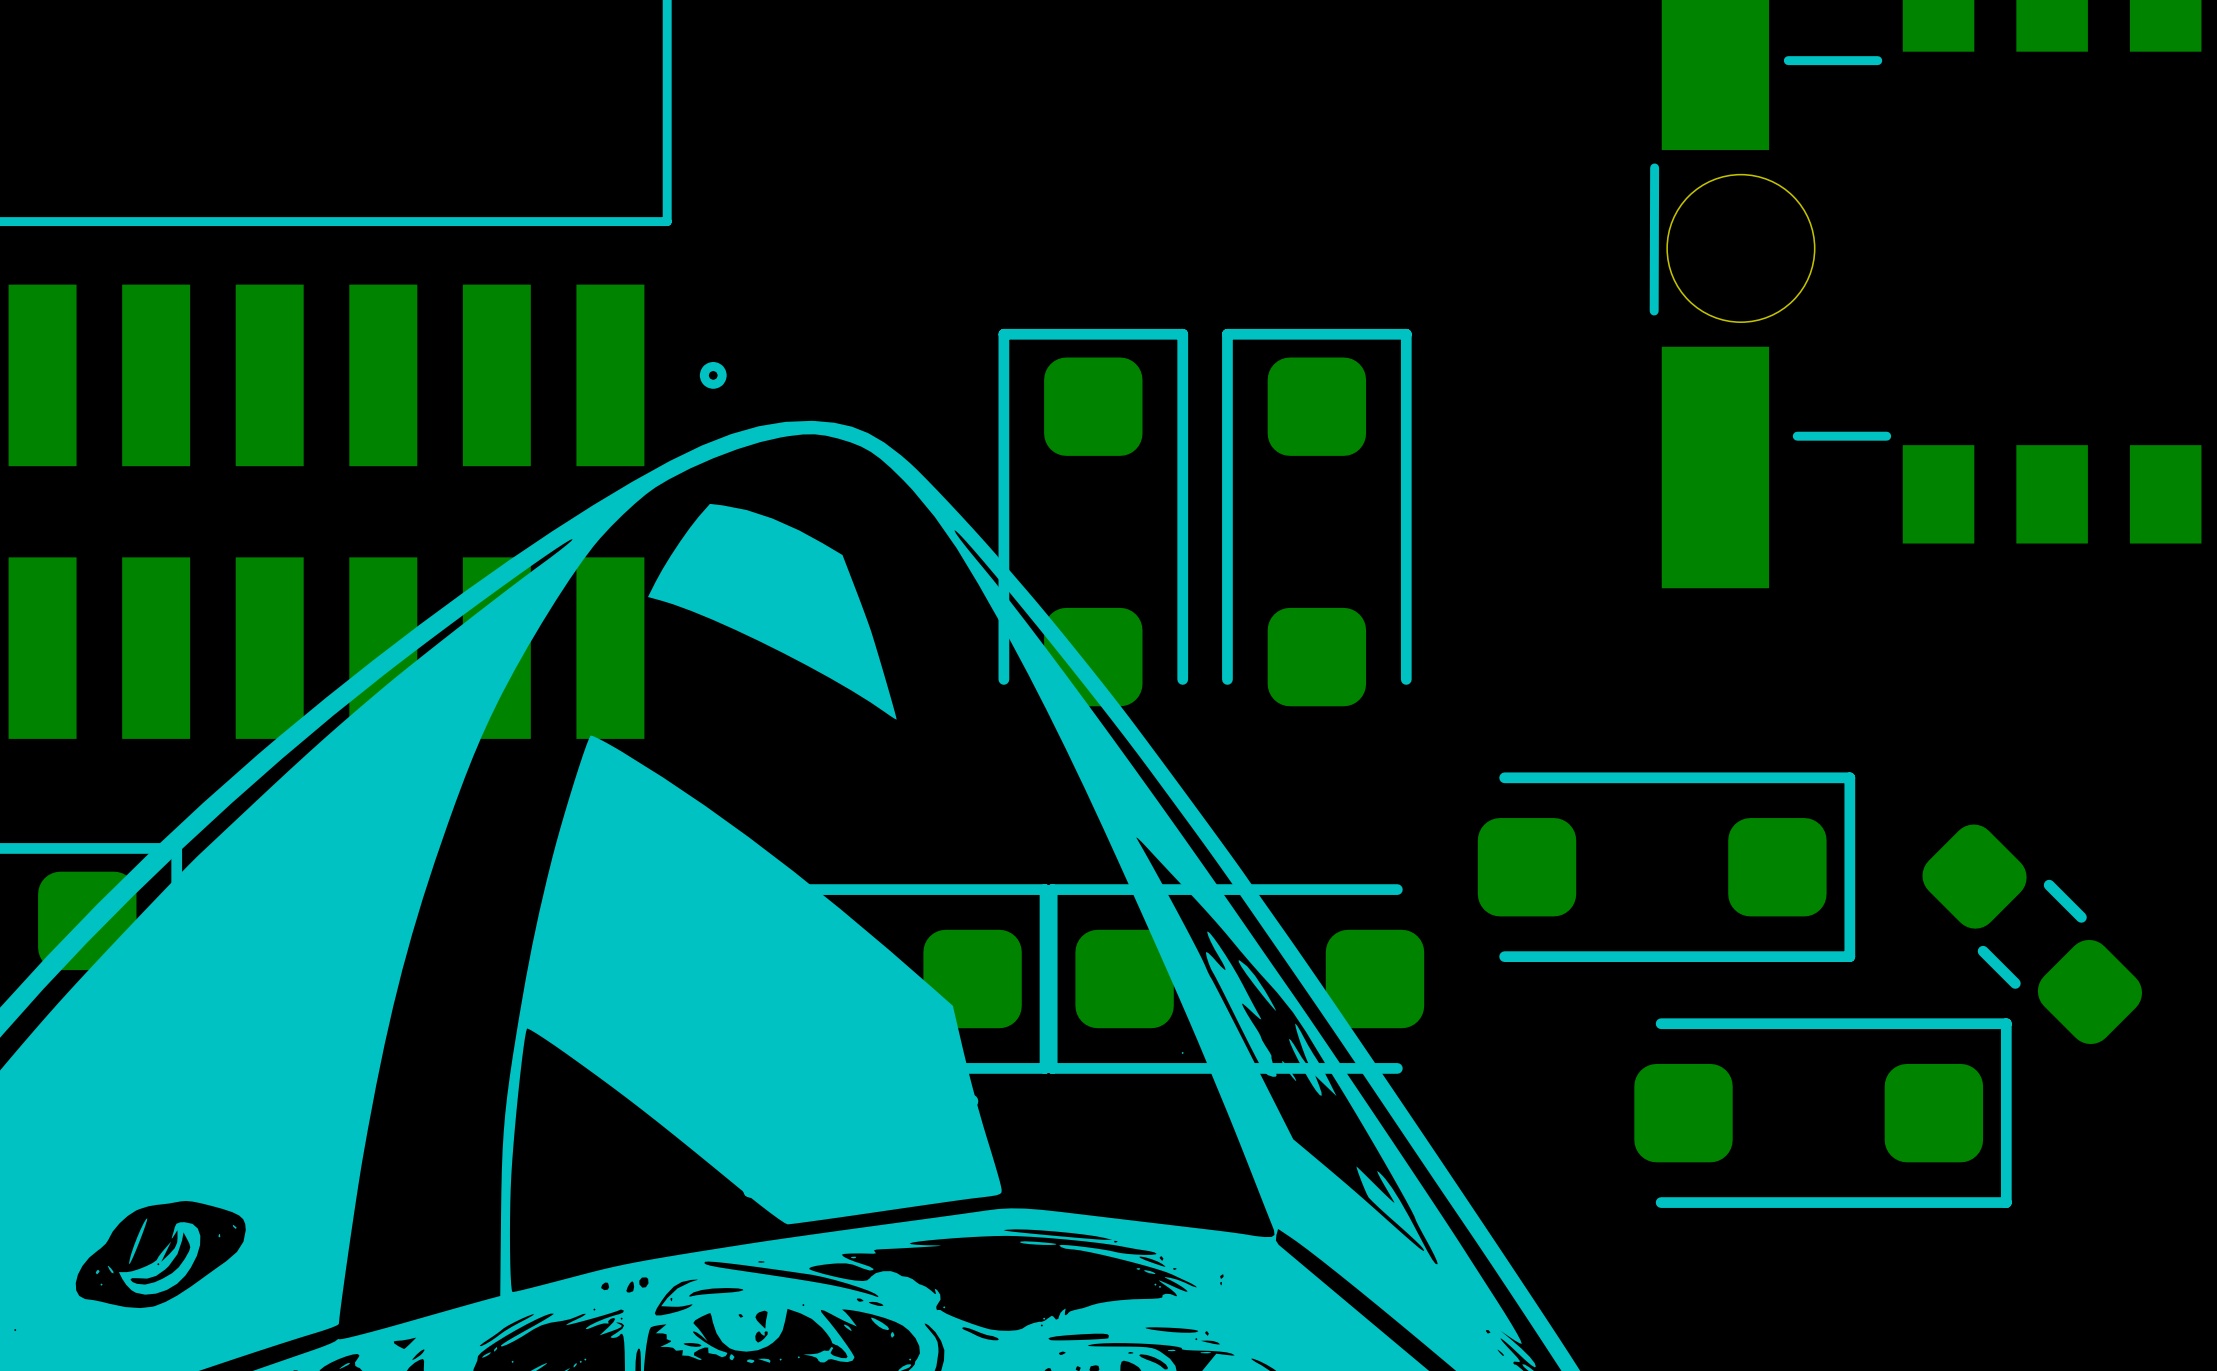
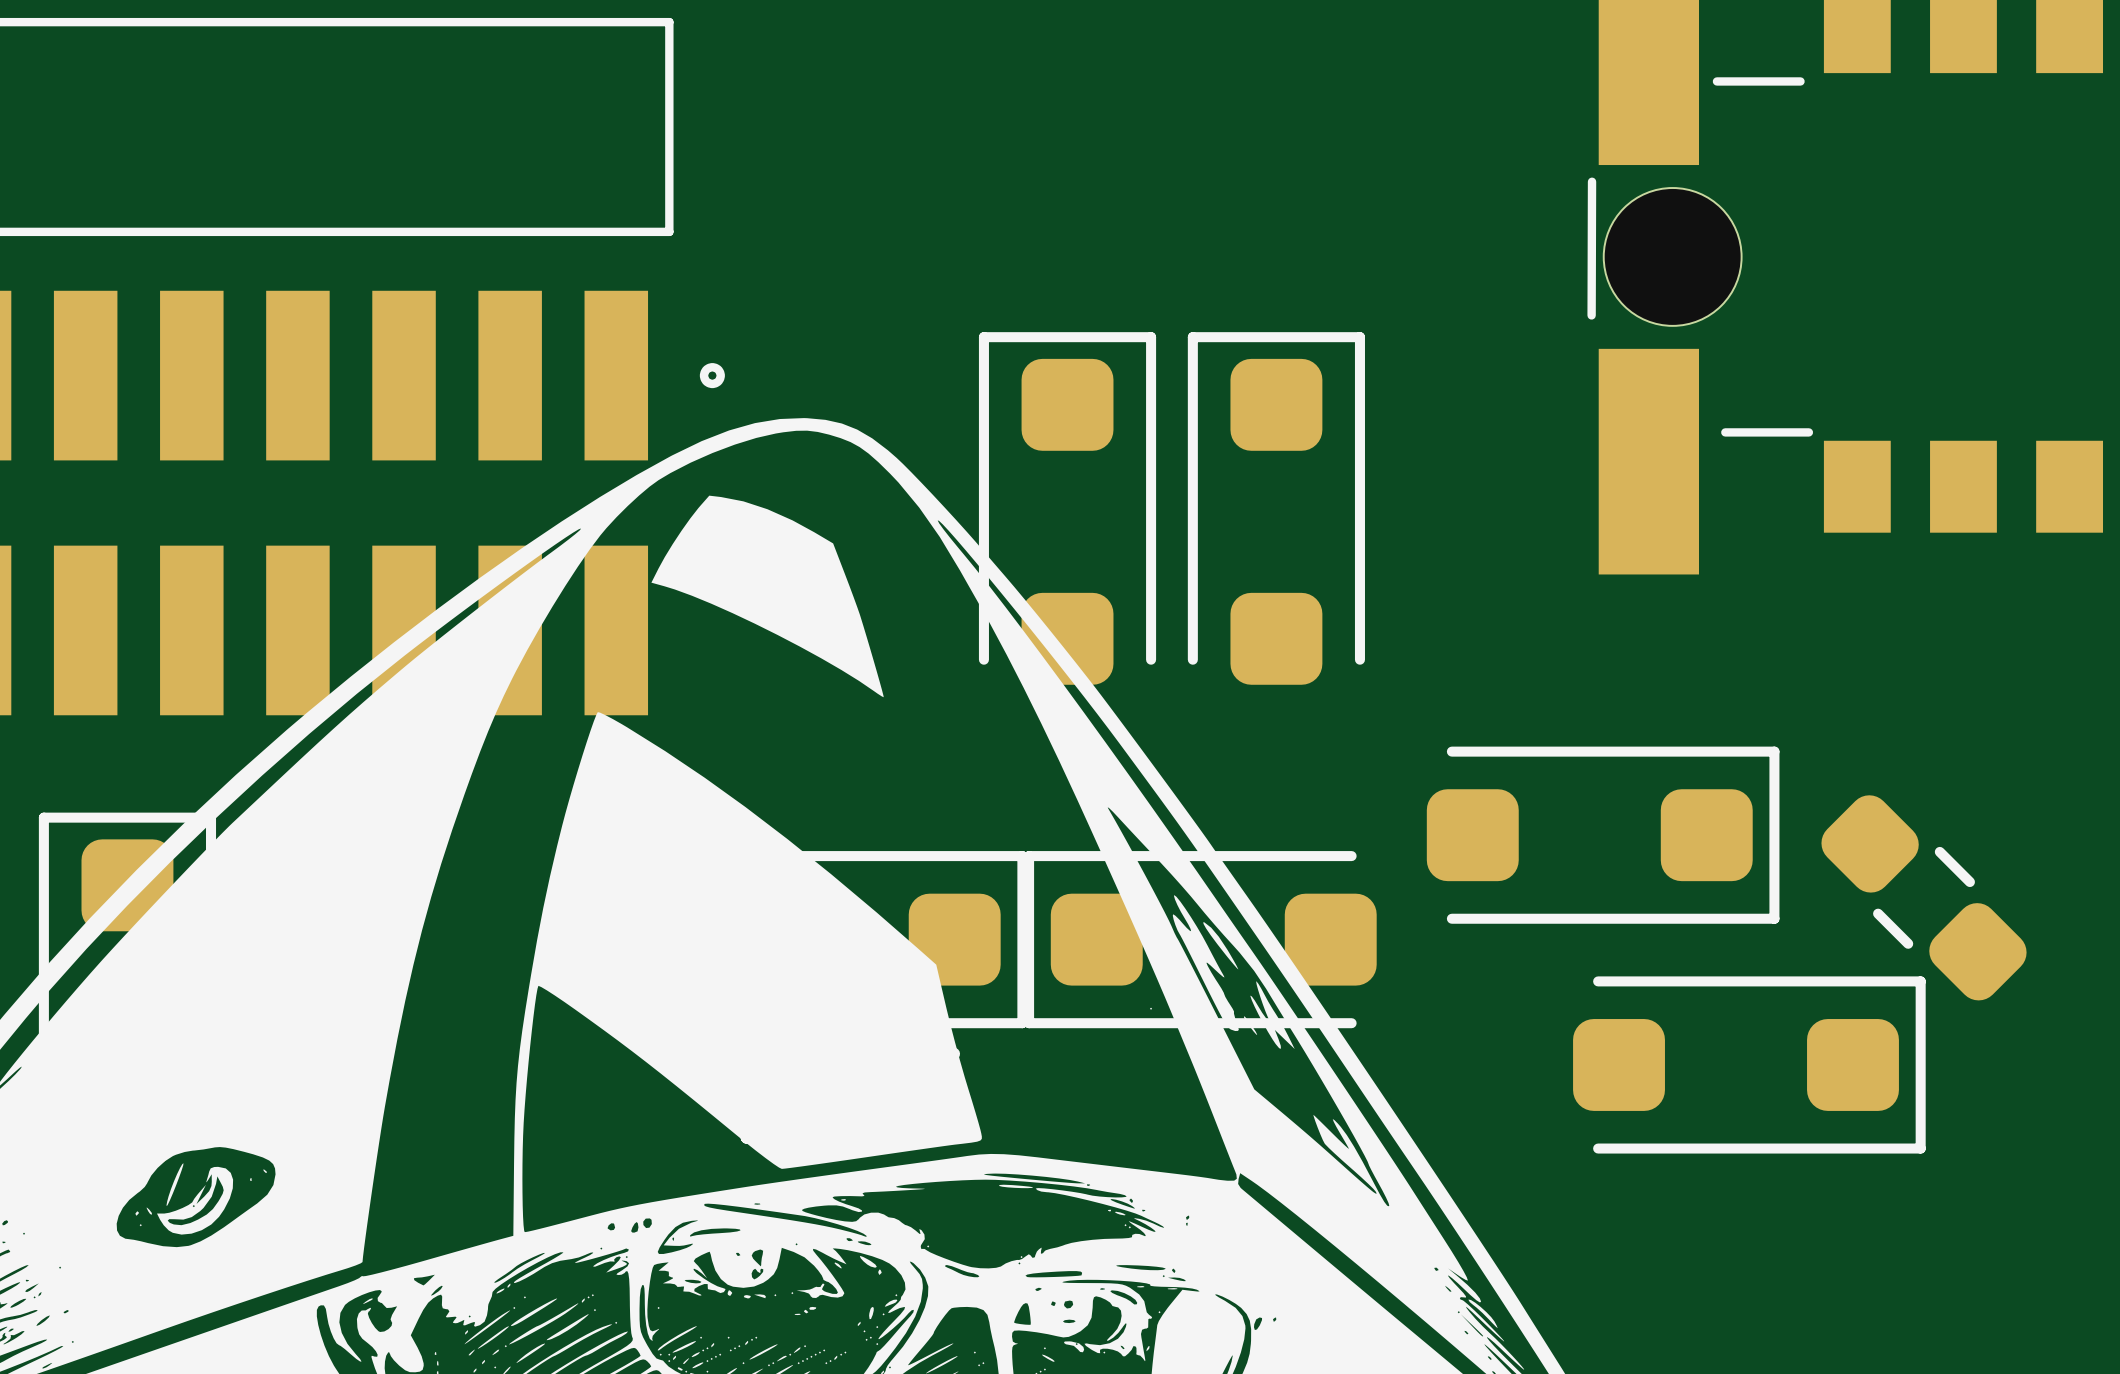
part position: (2032, 934) -> (1924, 897)

